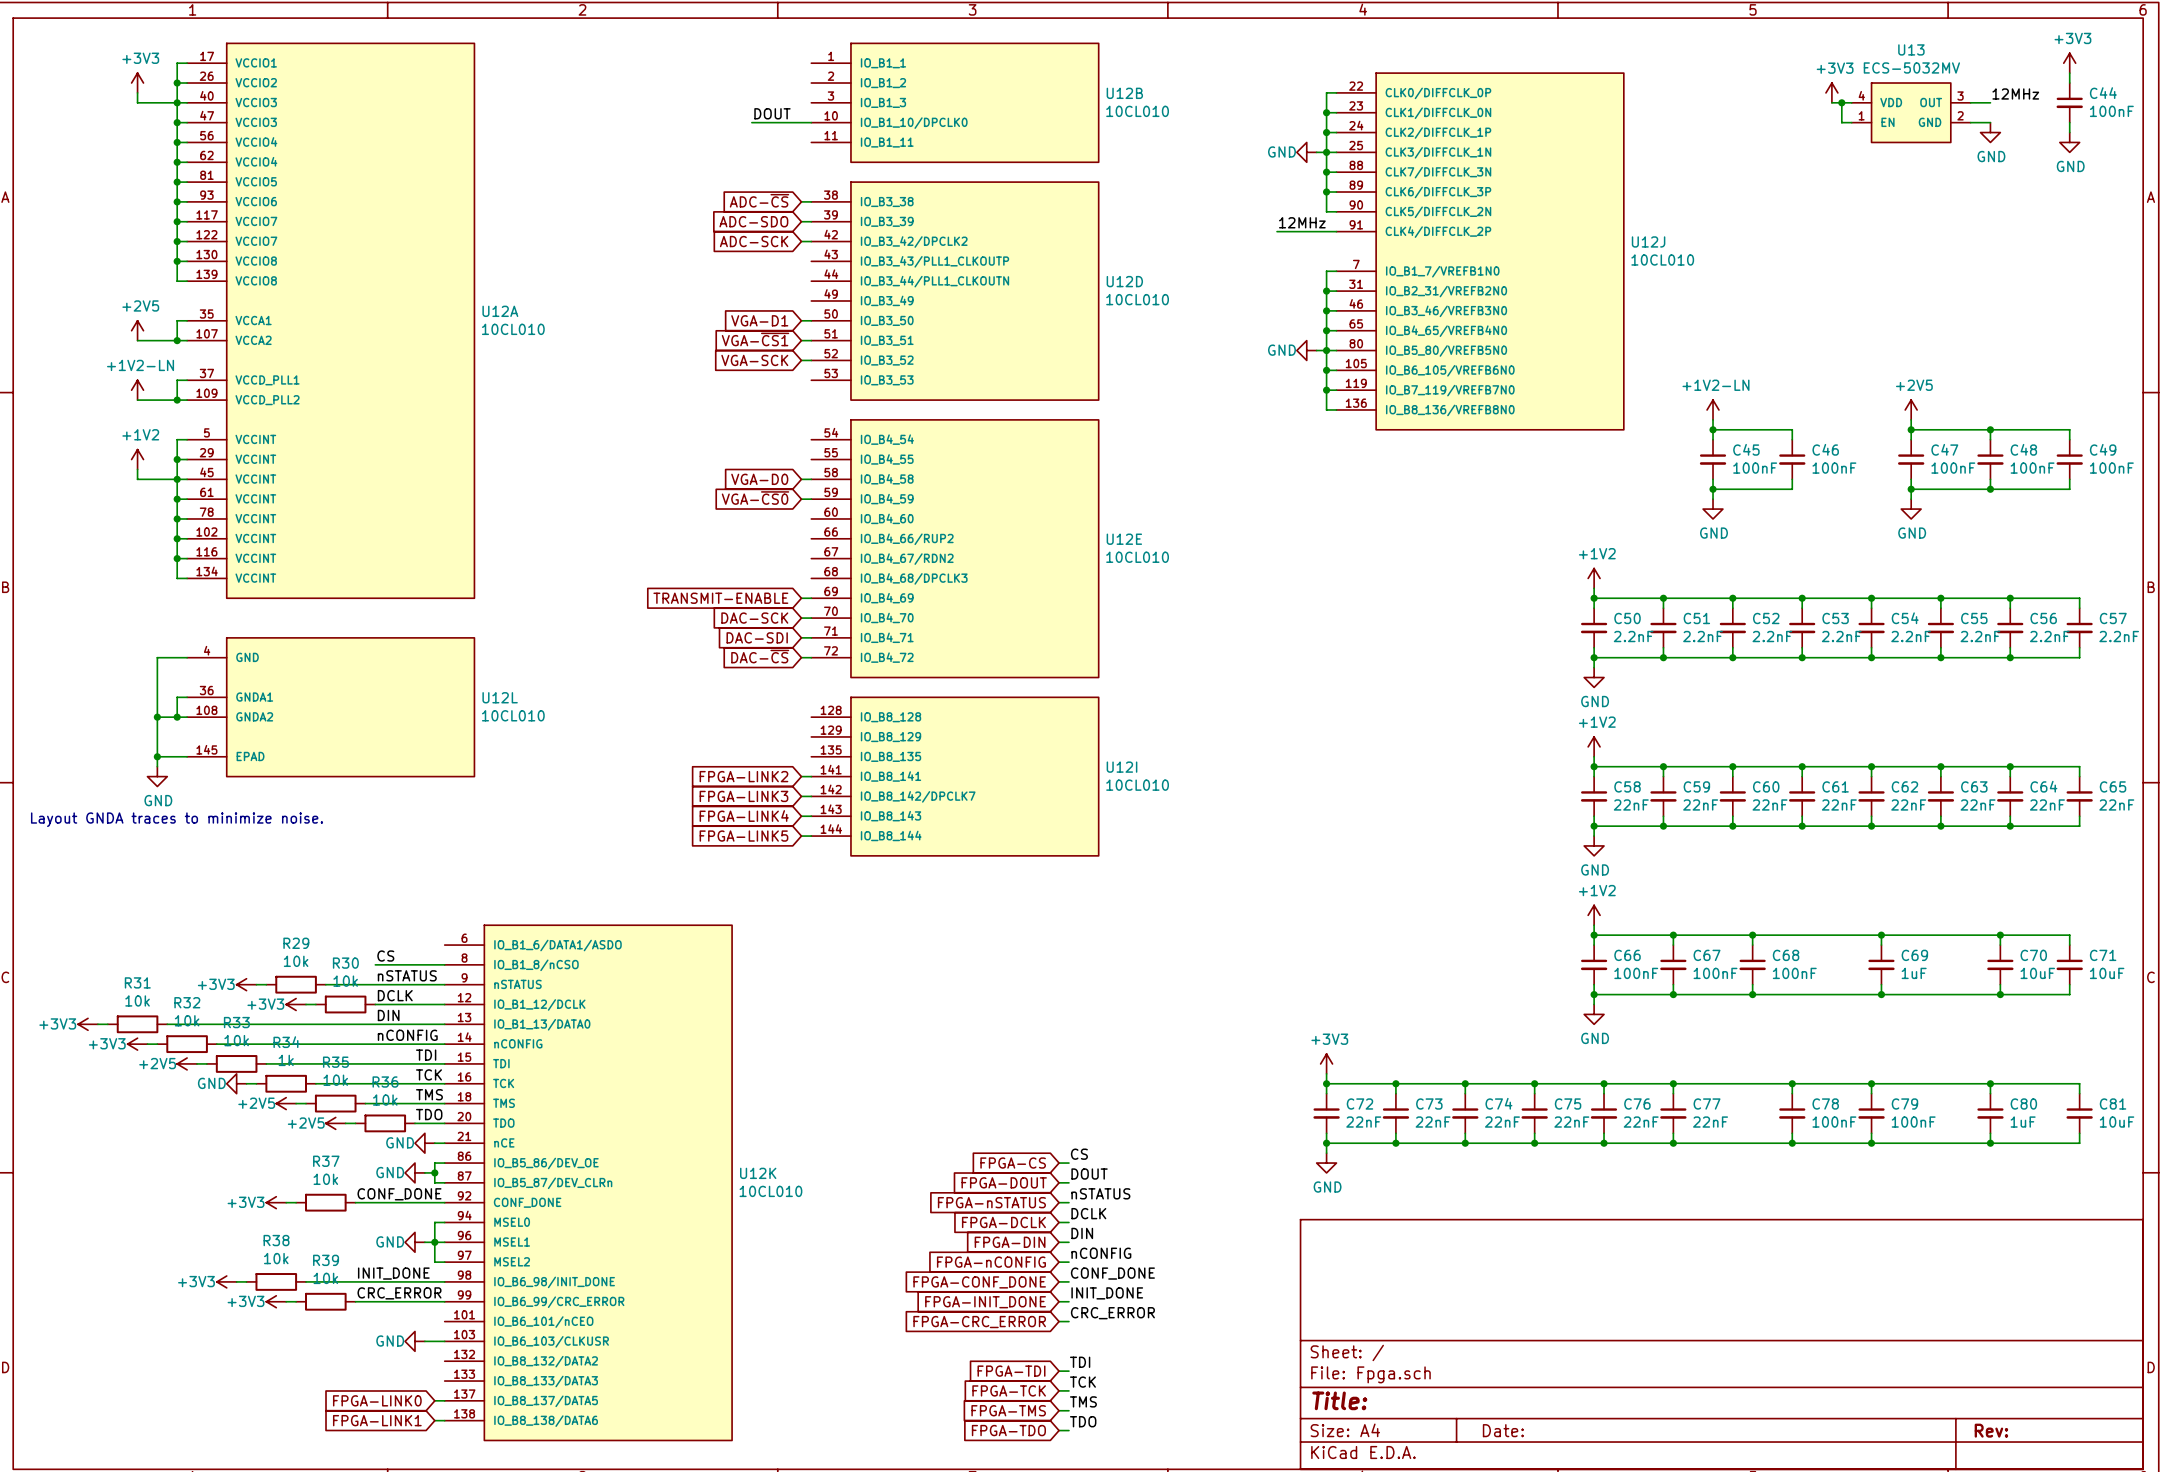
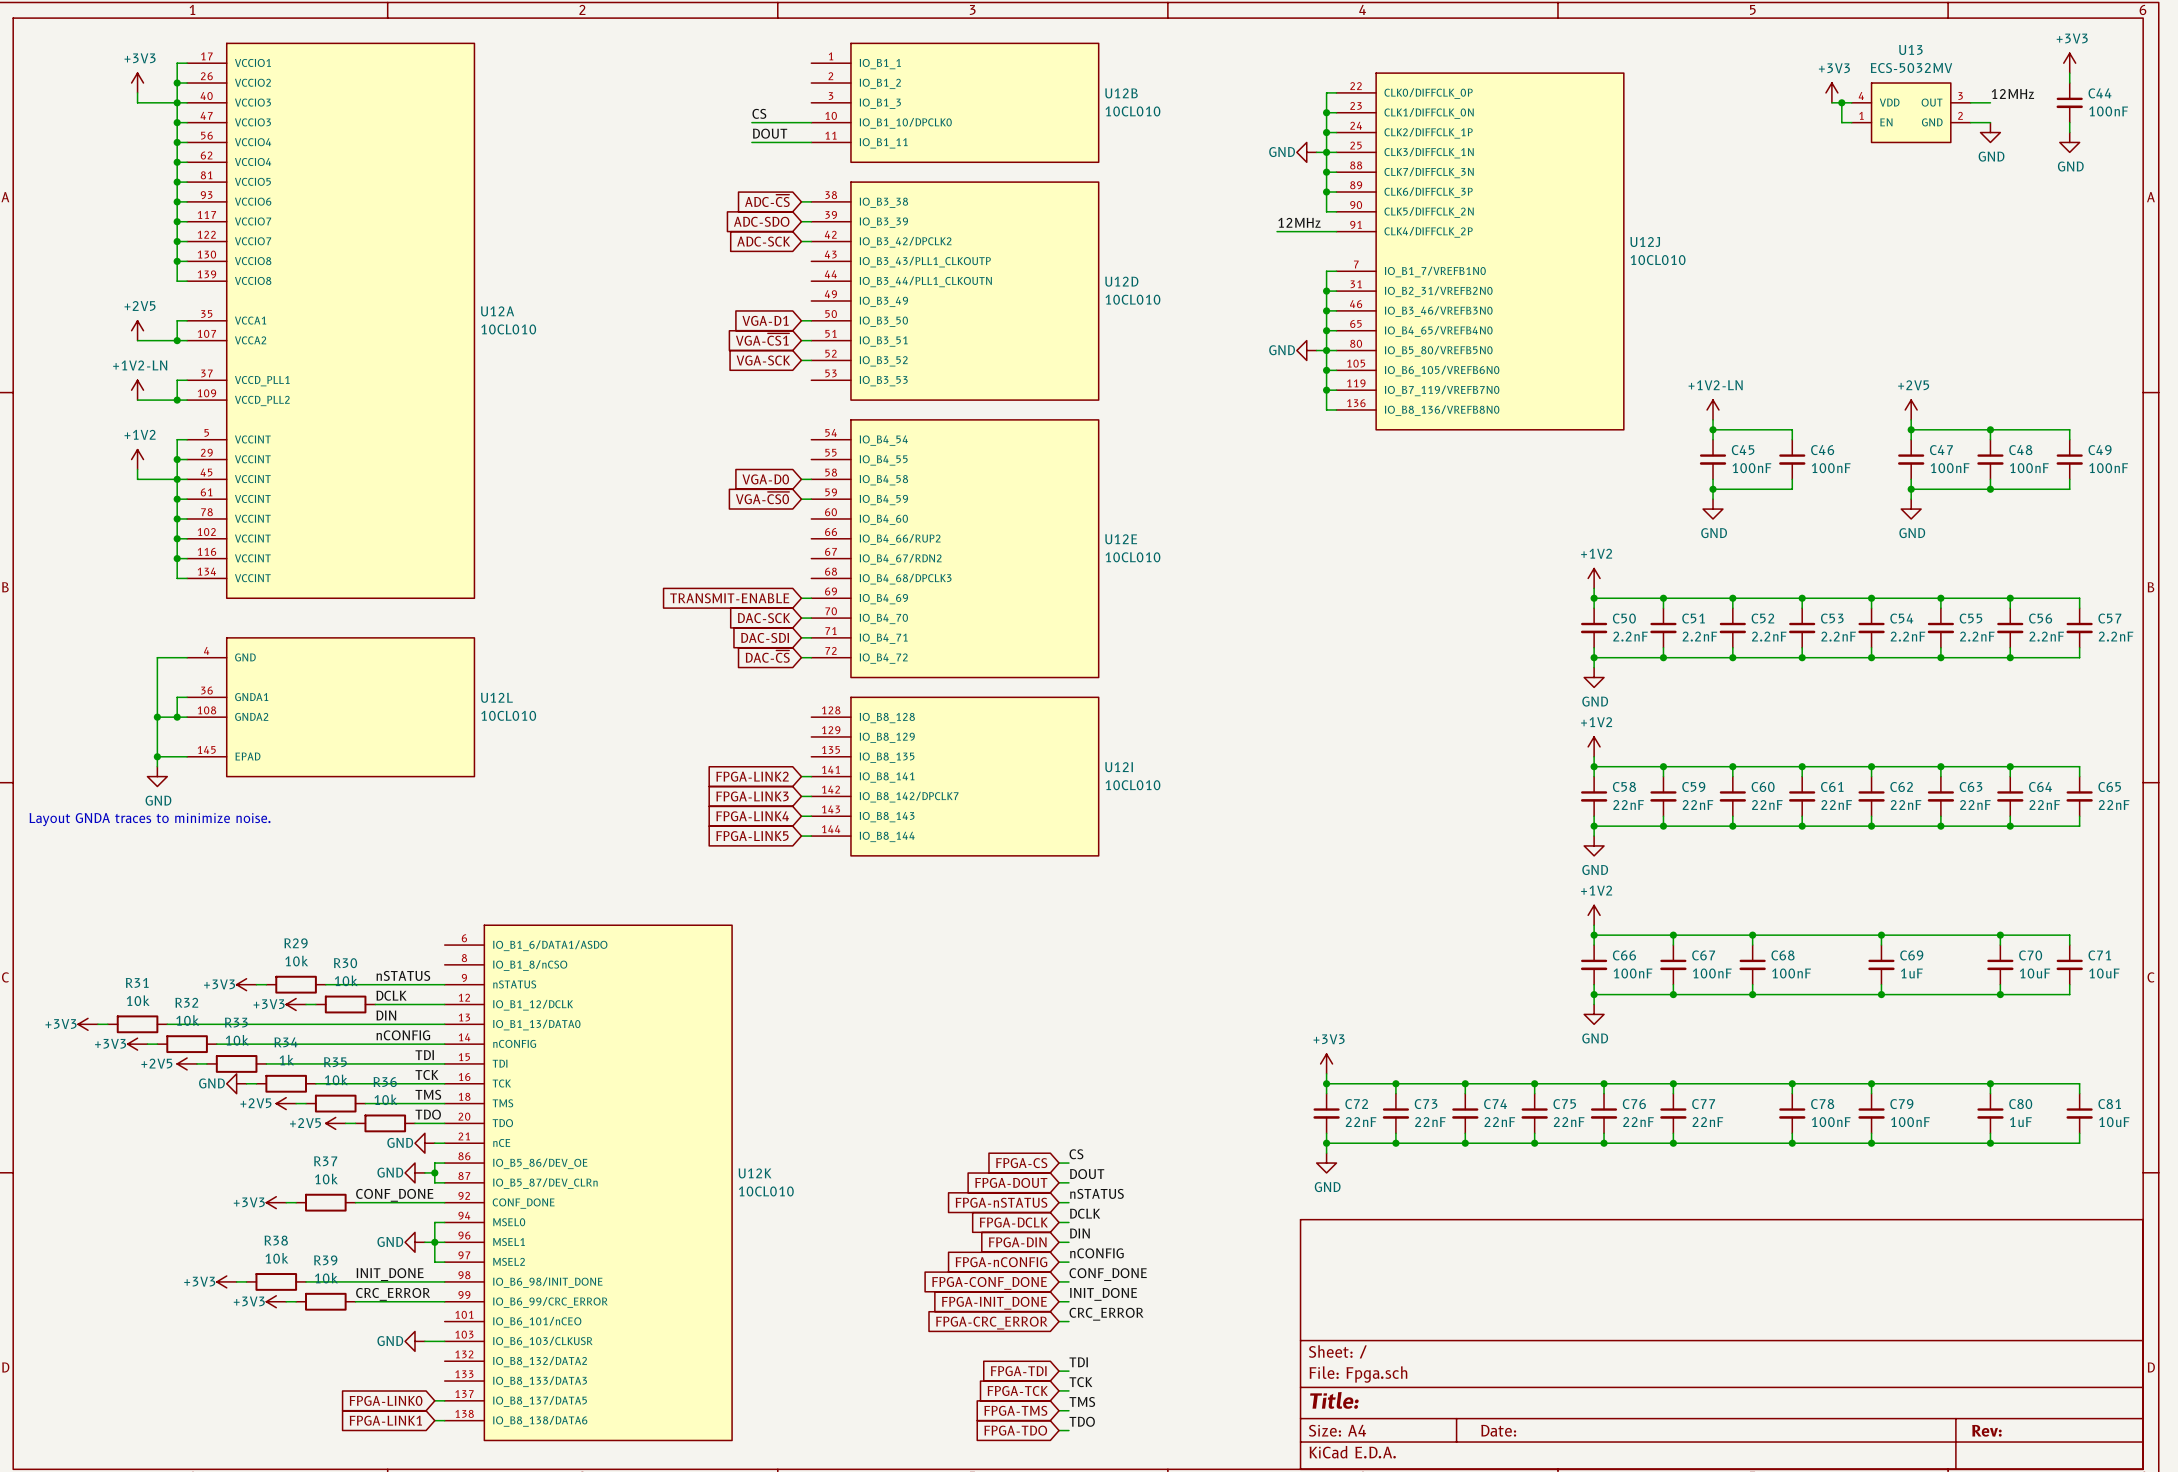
label: DOUT (772, 113) -> CS (759, 113)
label: none -> DOUT (770, 133)
wire: none -> (751, 142) (811, 142)
label: CS (385, 956) -> none
wire: (375, 964) (444, 964) -> none

